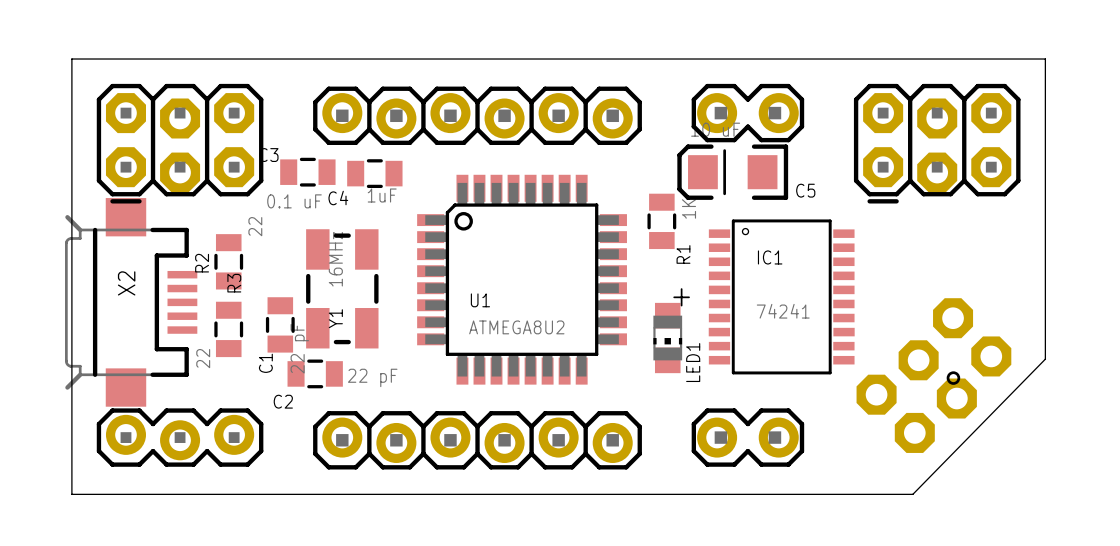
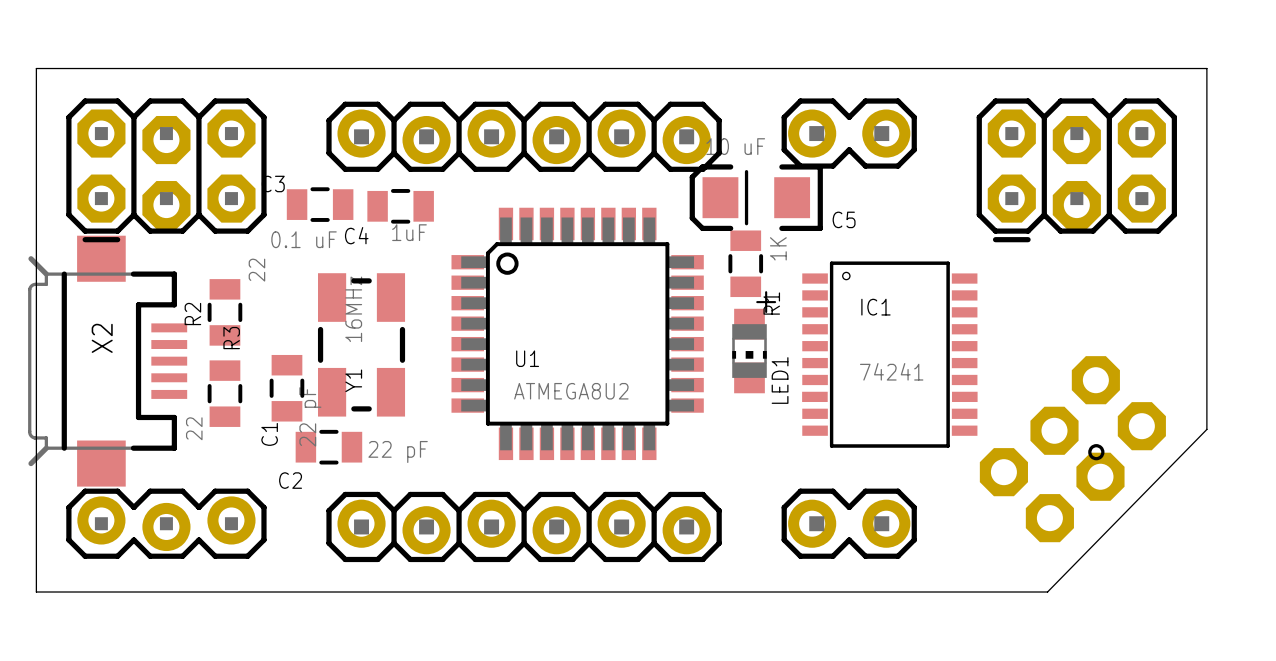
C5 position: (732, 172) -> (756, 197)
LED1 position: (667, 338) -> (749, 351)

